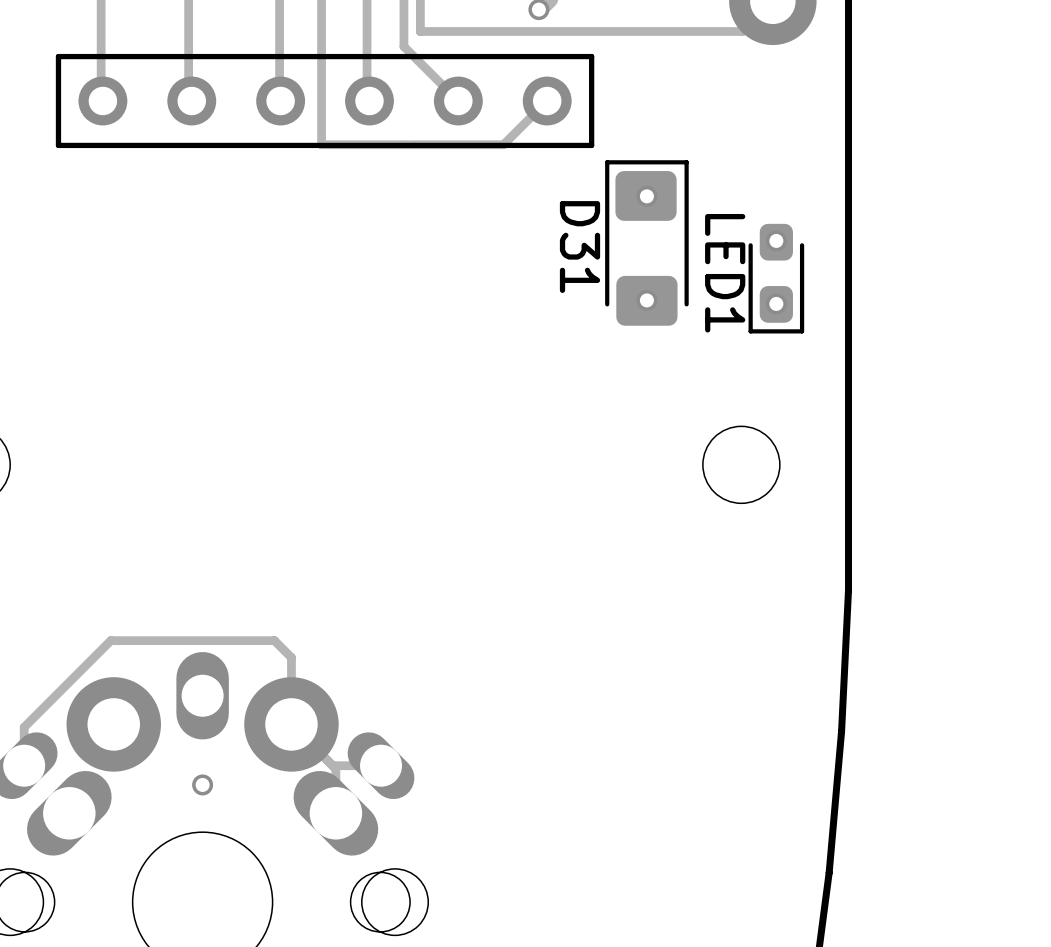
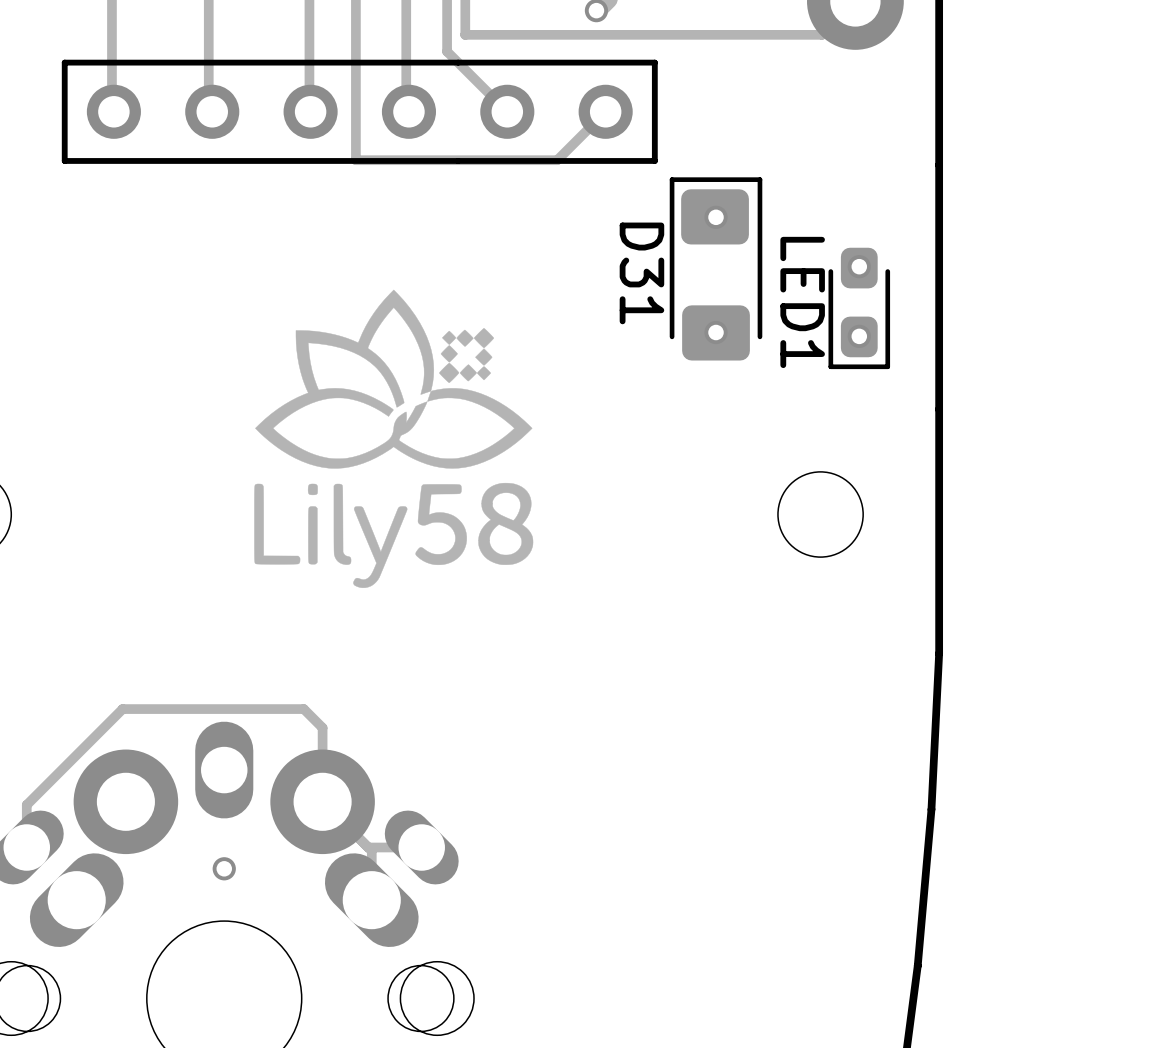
drawing: none -> [254, 289, 534, 589]

